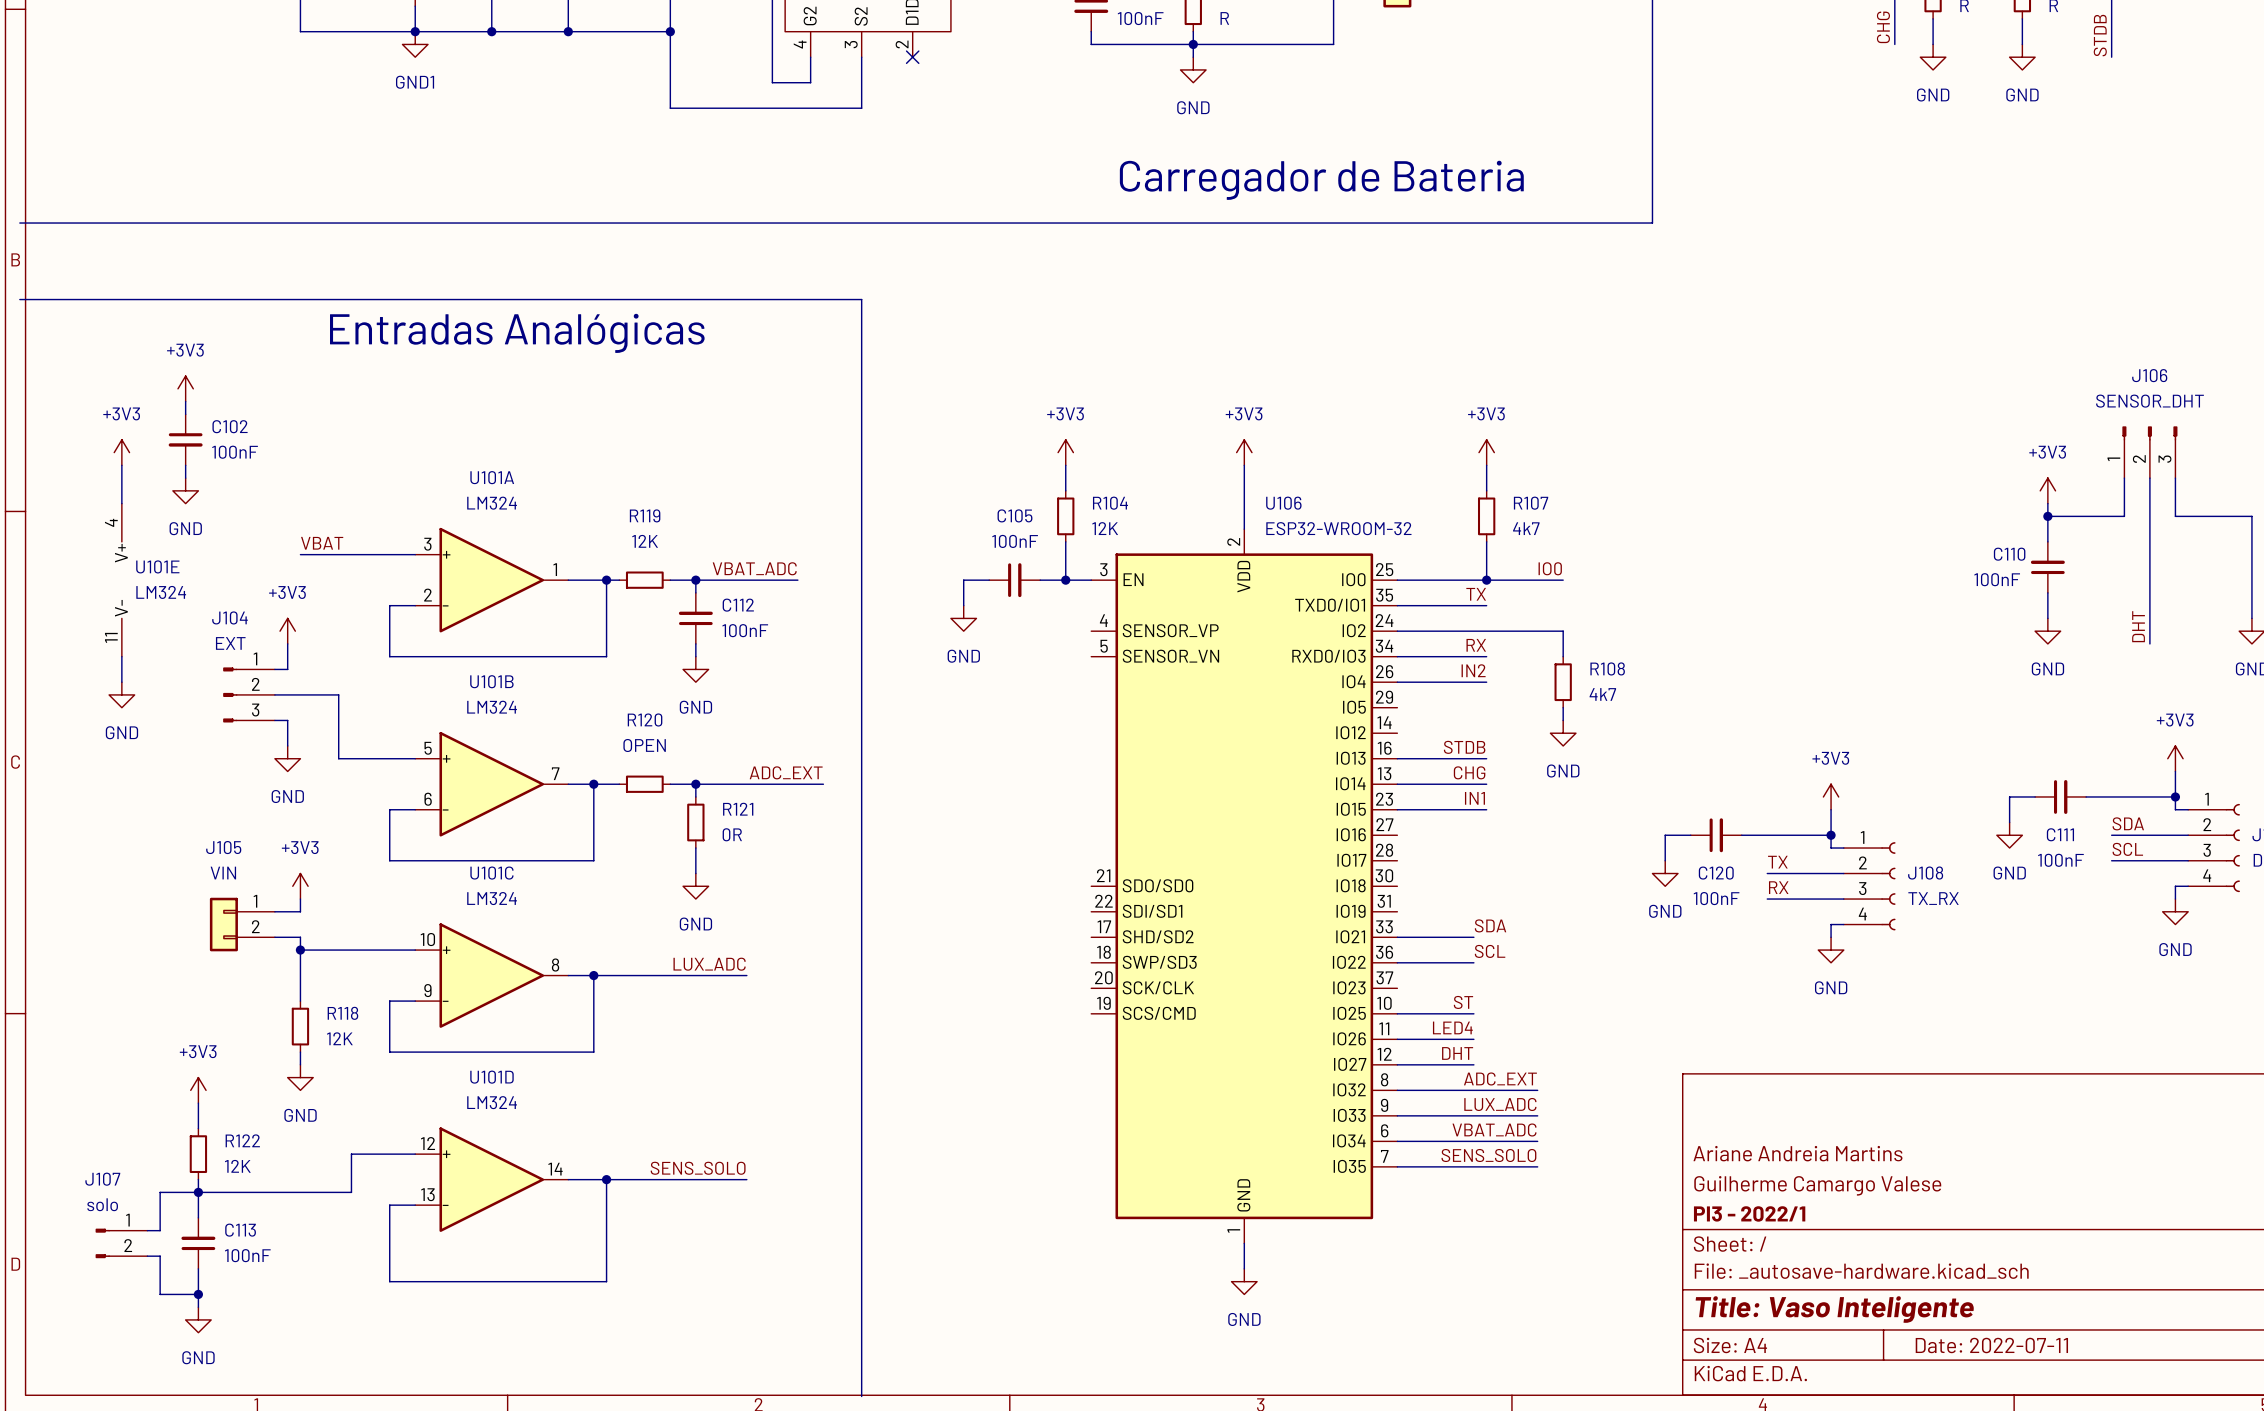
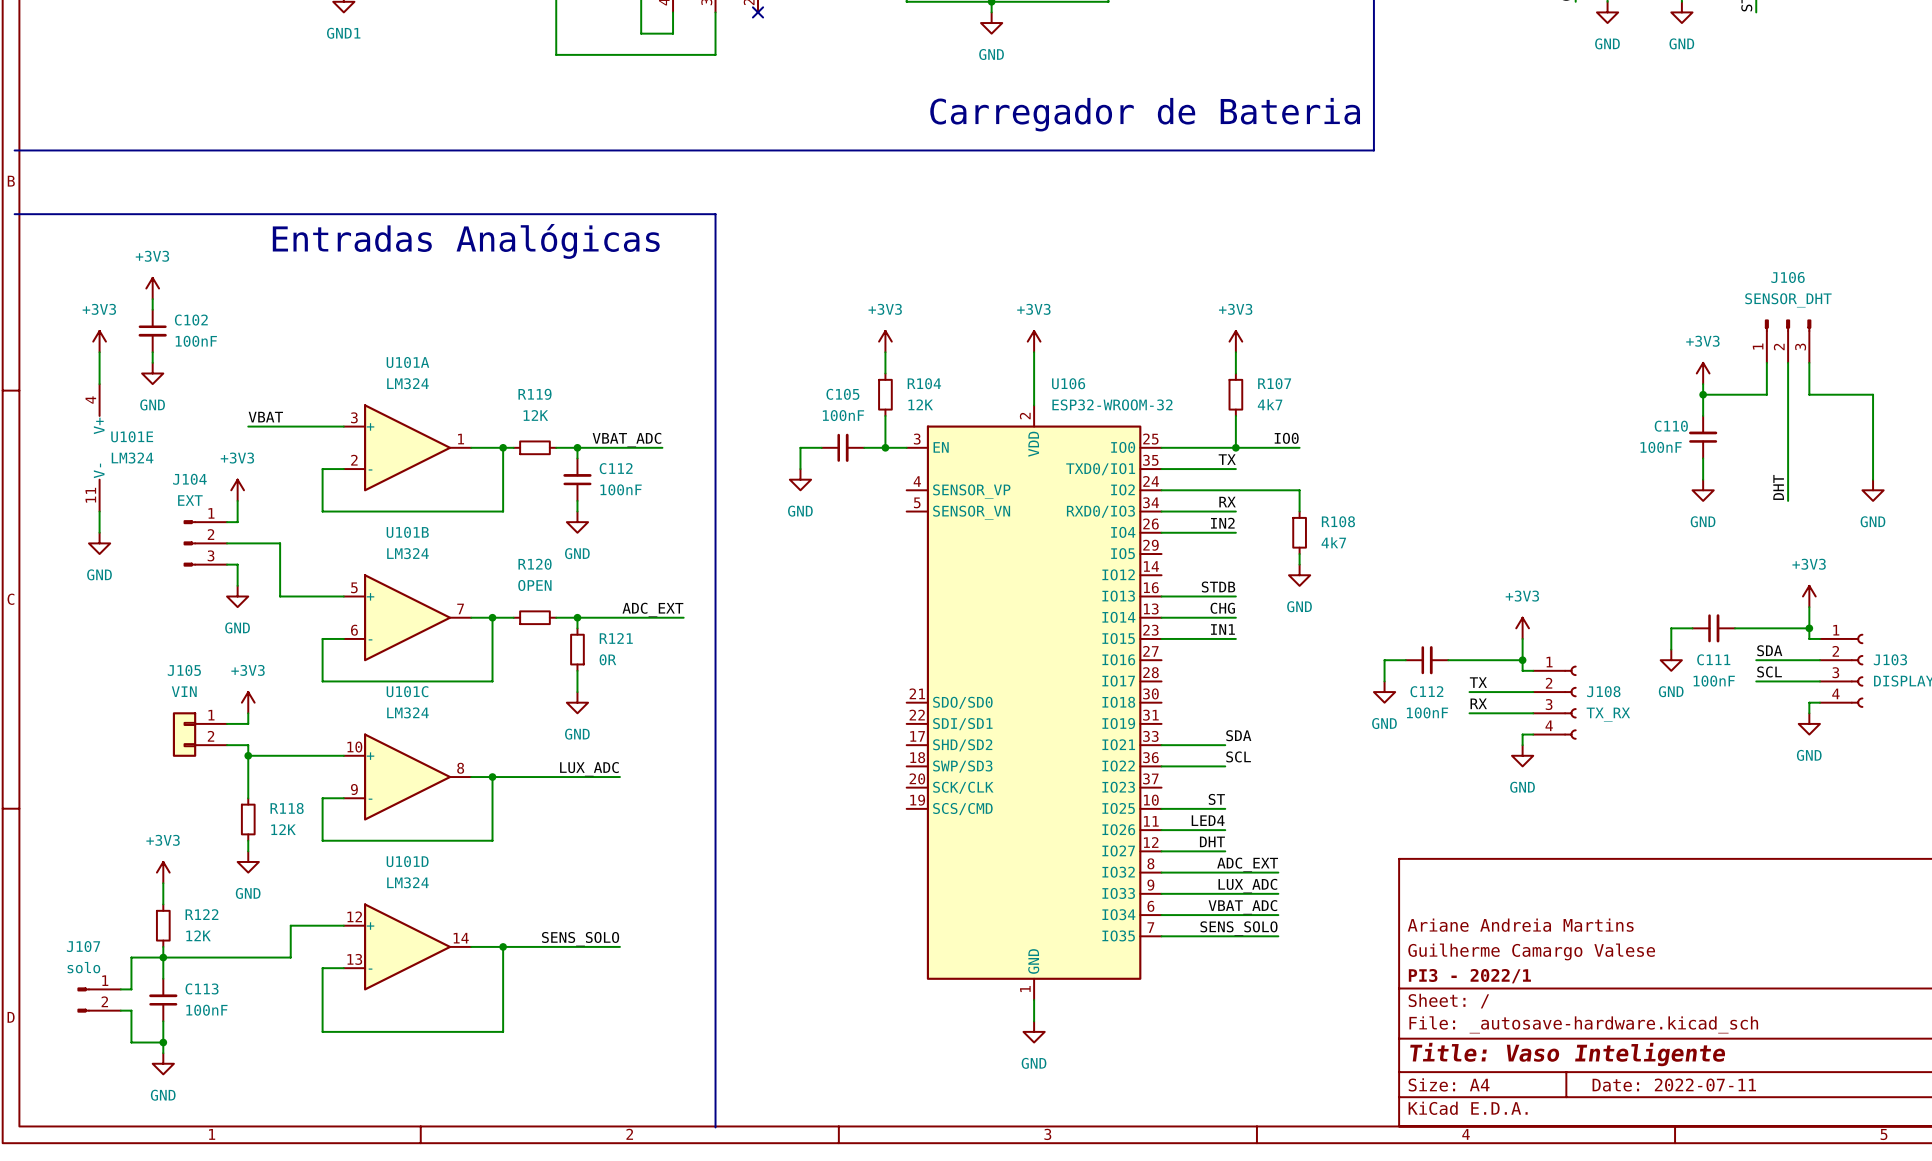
C120 name: C120 (1716, 873) -> C112 (1426, 691)

